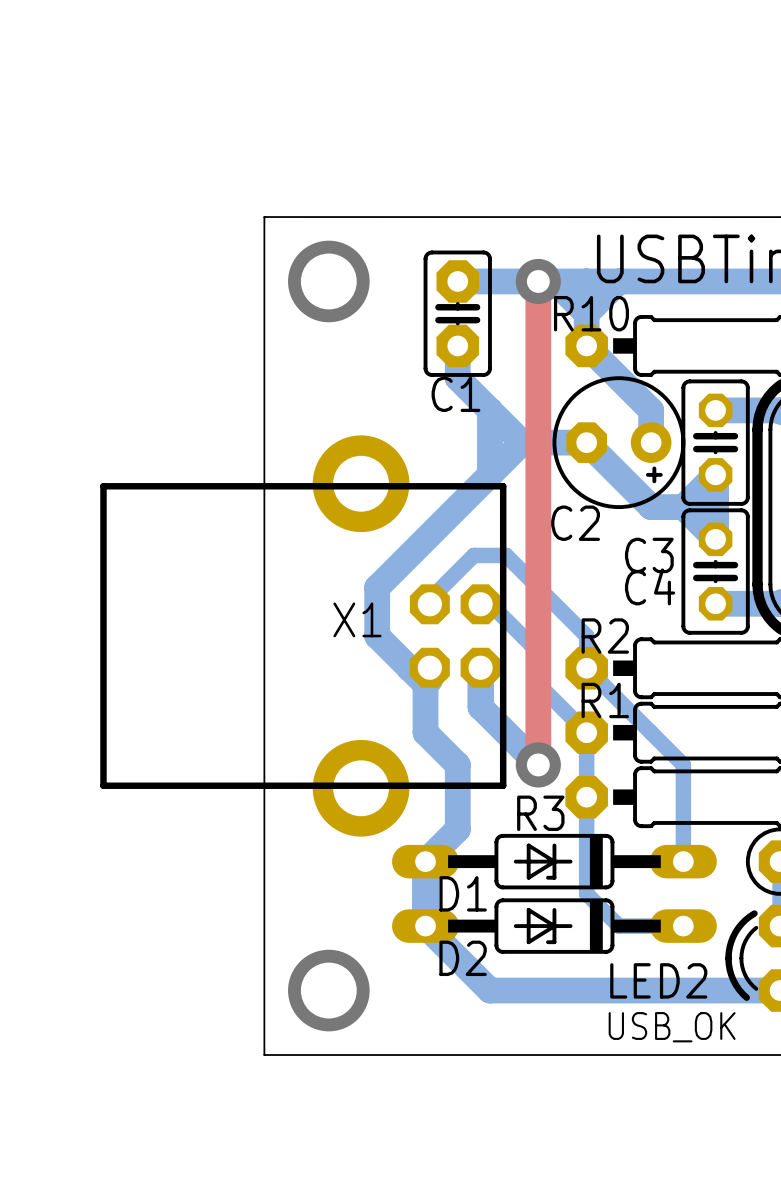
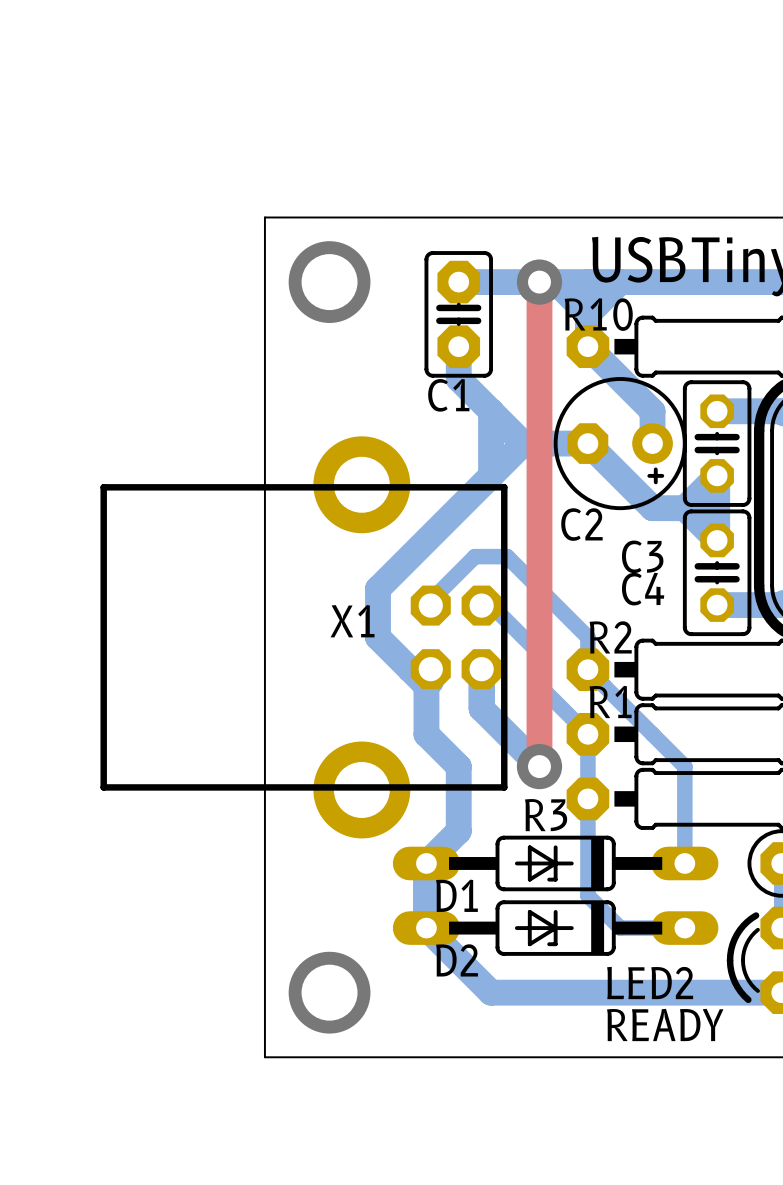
text: USB_OK (672, 1027) -> READY (665, 1024)

